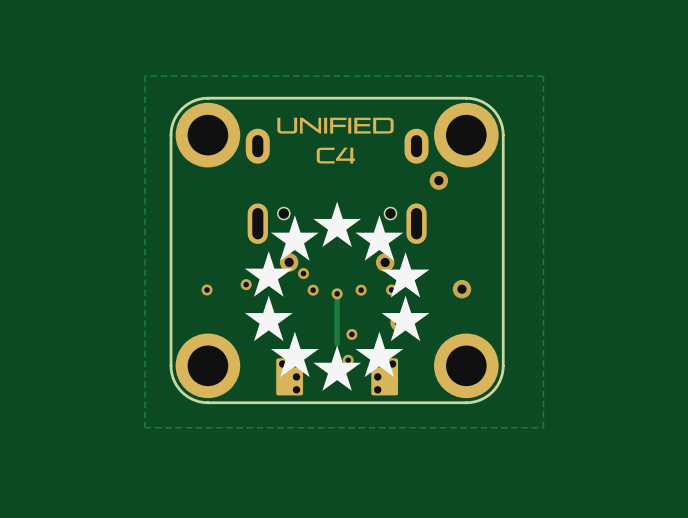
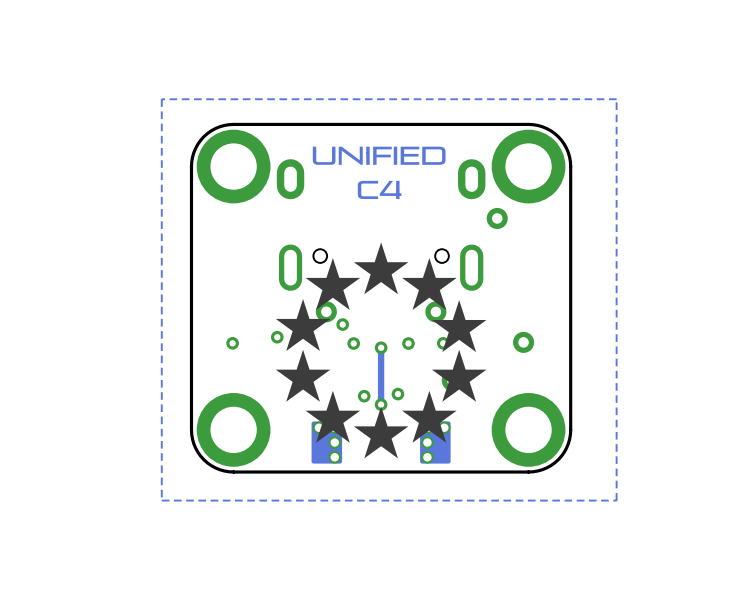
via: none -> (364, 396)
via: none -> (381, 404)
via: (348, 360) -> none

